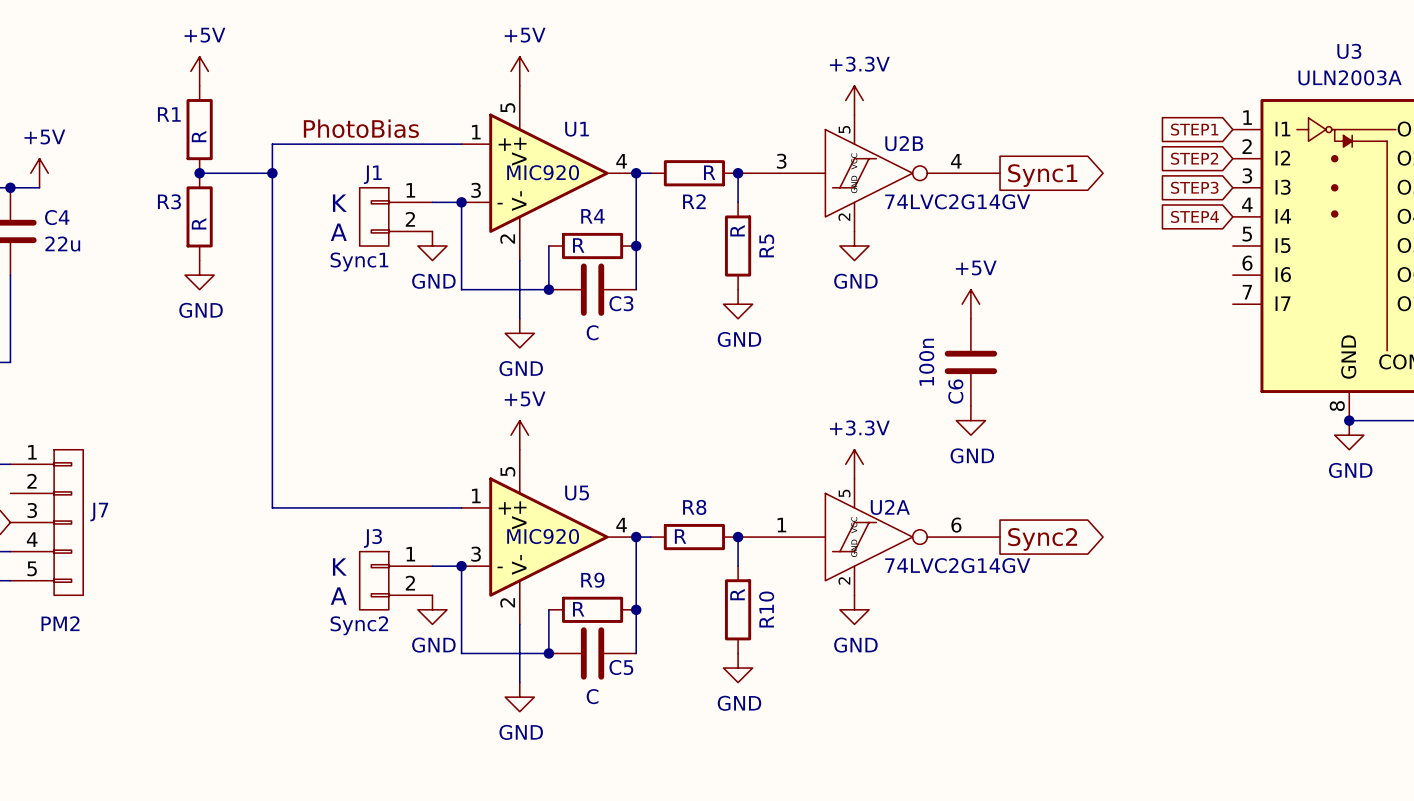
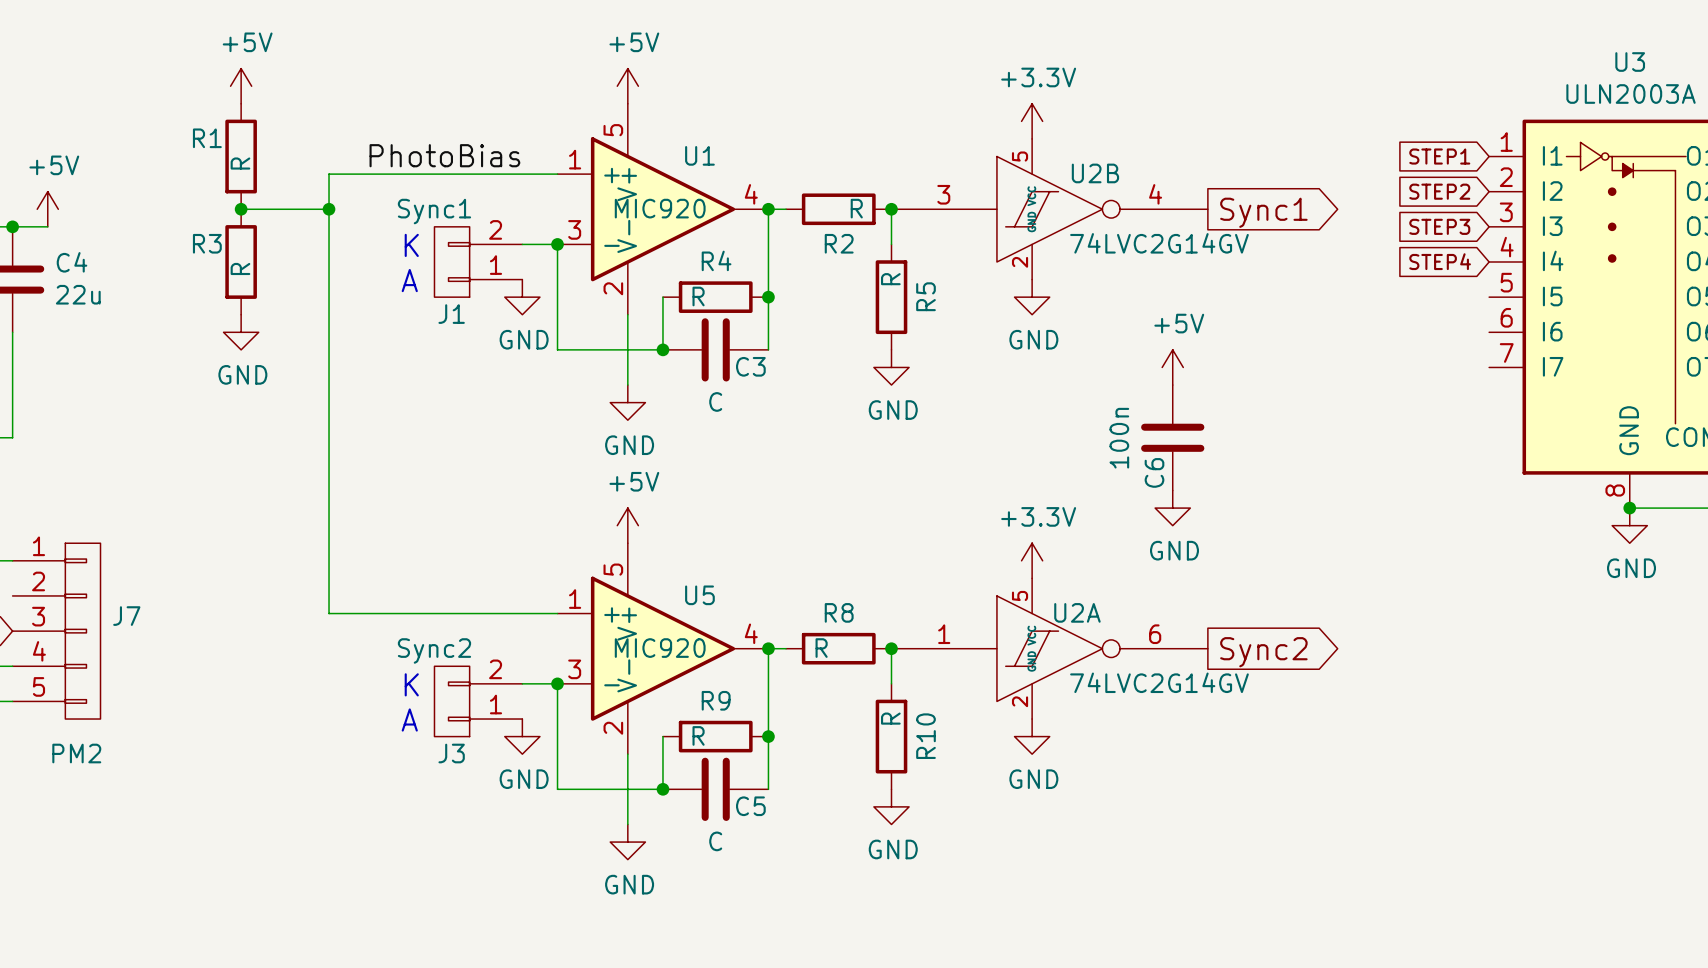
J1 flip: as is (374, 216) -> up-down (452, 261)
J3 flip: as is (374, 580) -> up-down (452, 701)

